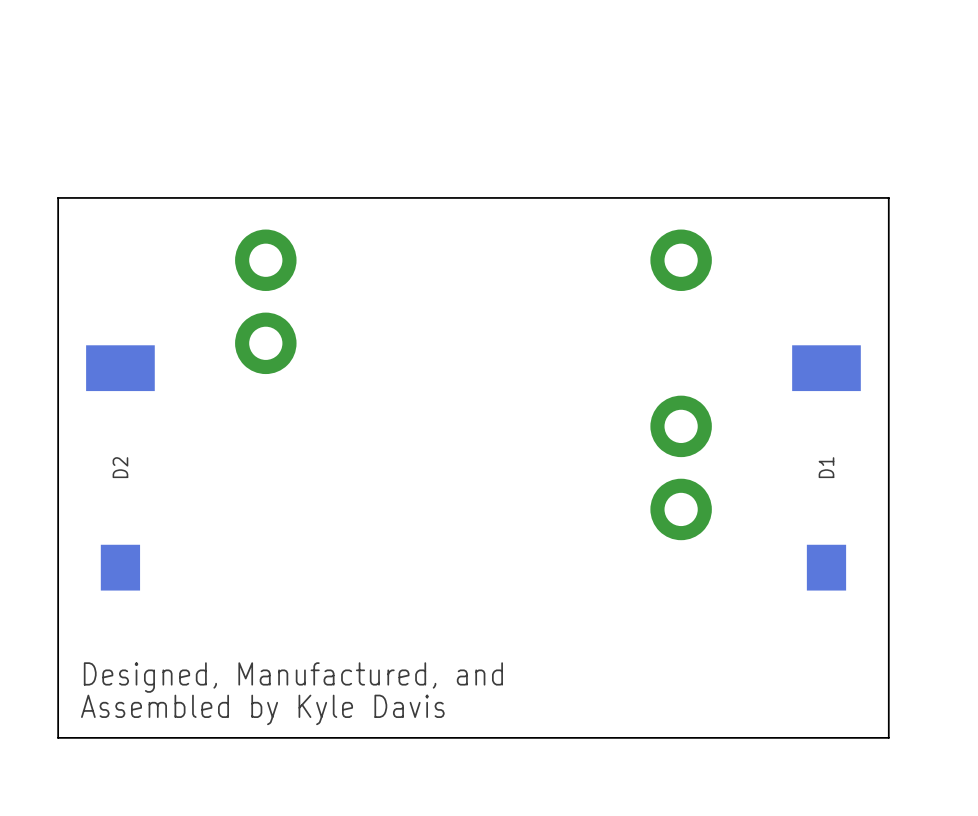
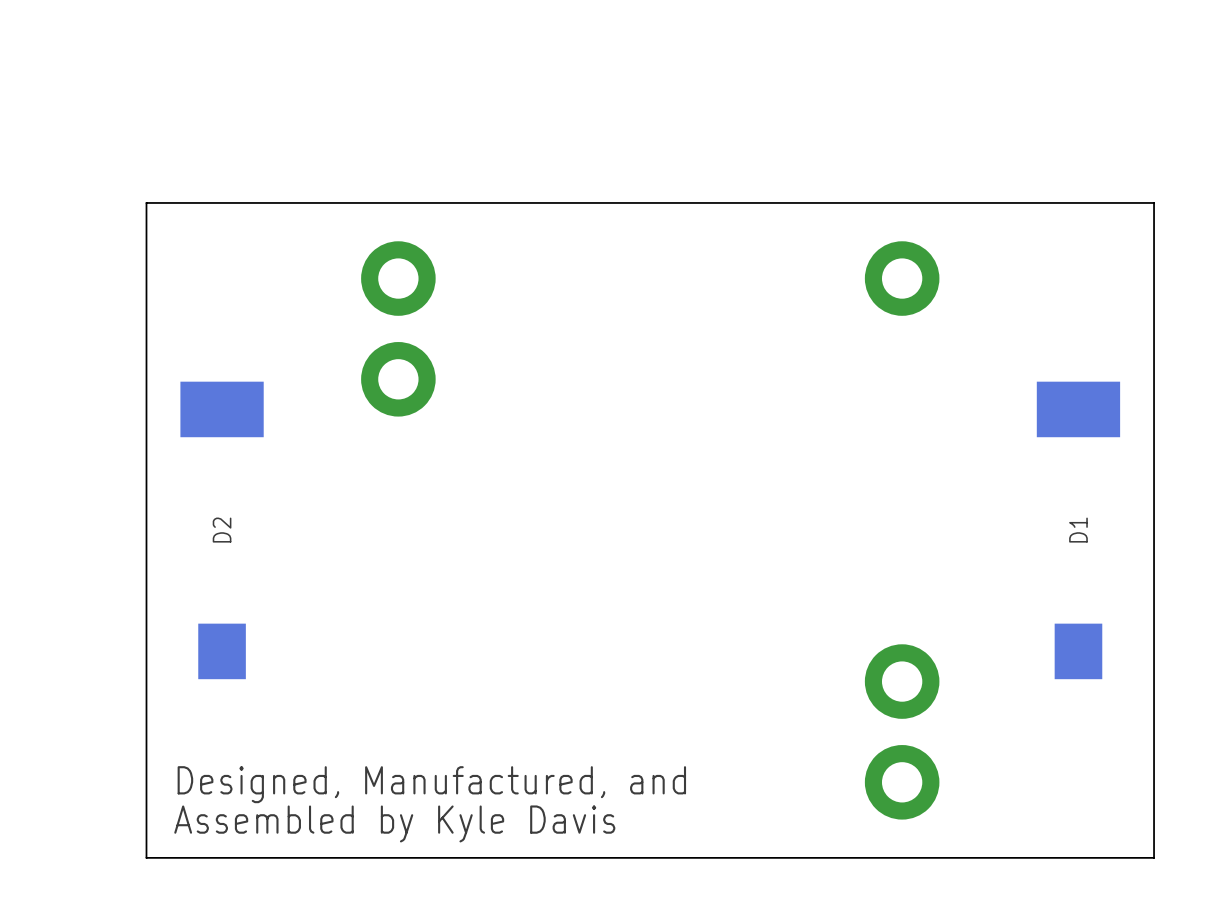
part: (681, 426) -> none
part: (681, 509) -> none
part: none -> (902, 681)
part: none -> (902, 782)

